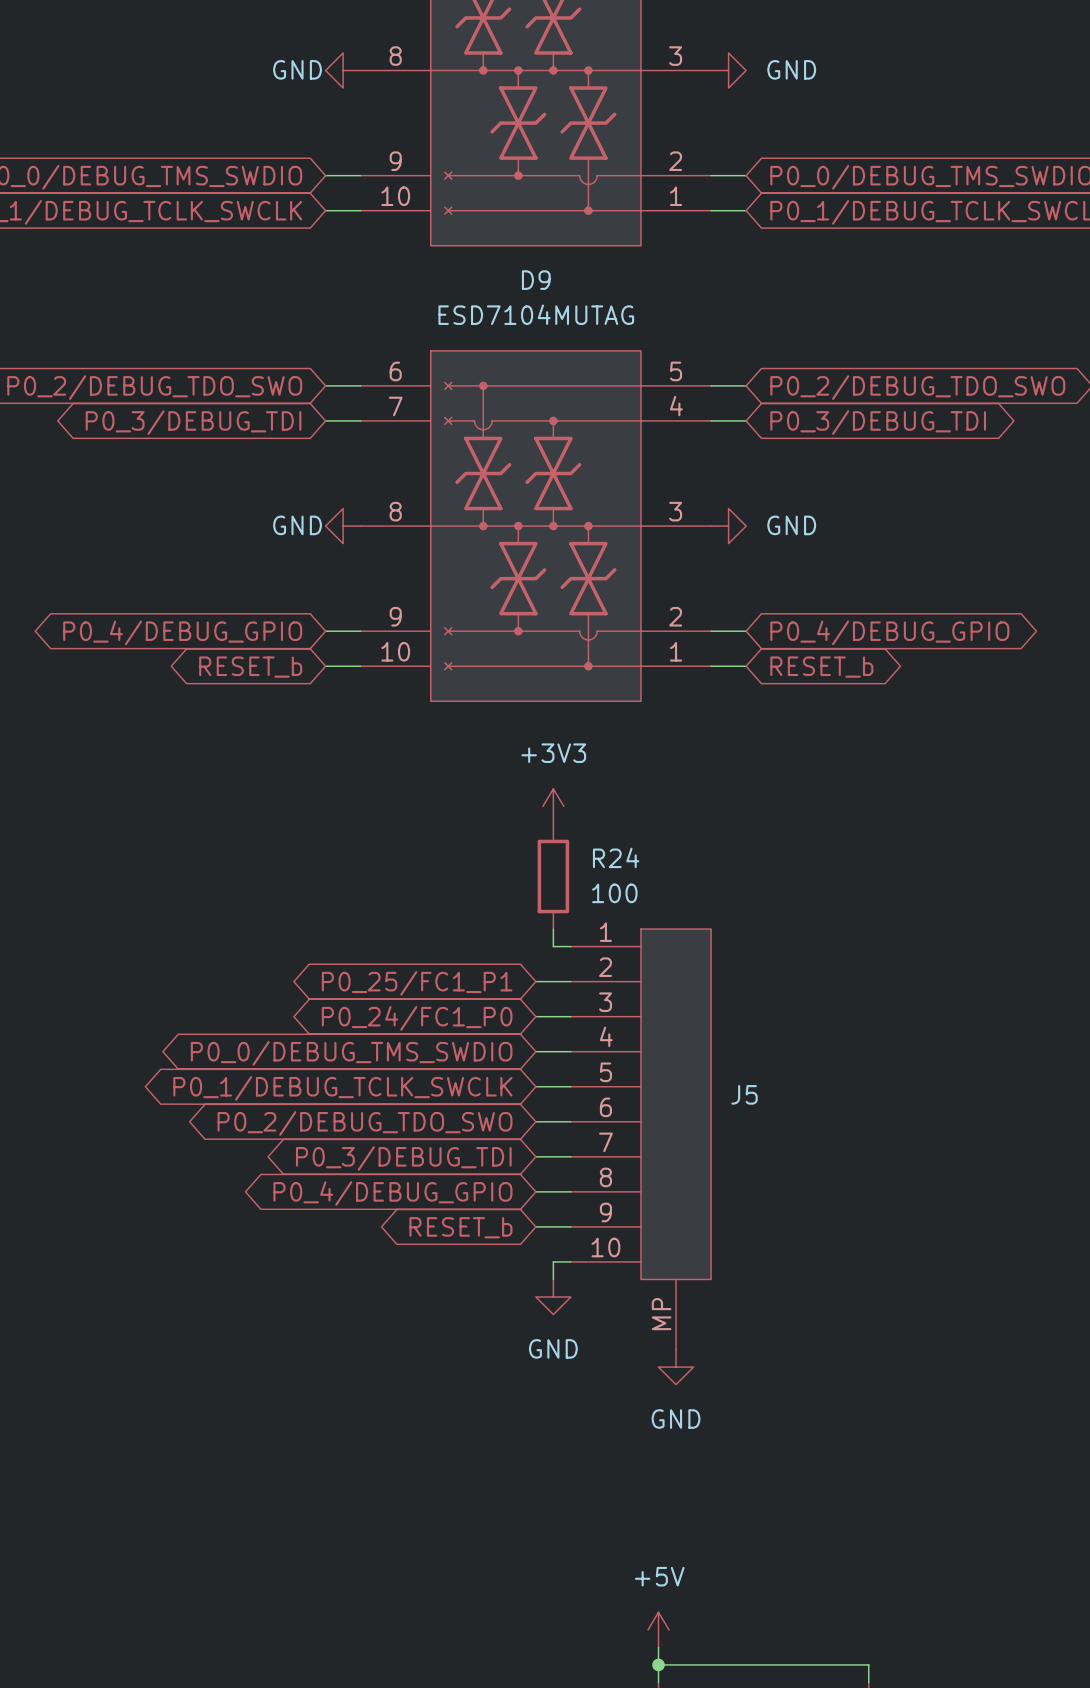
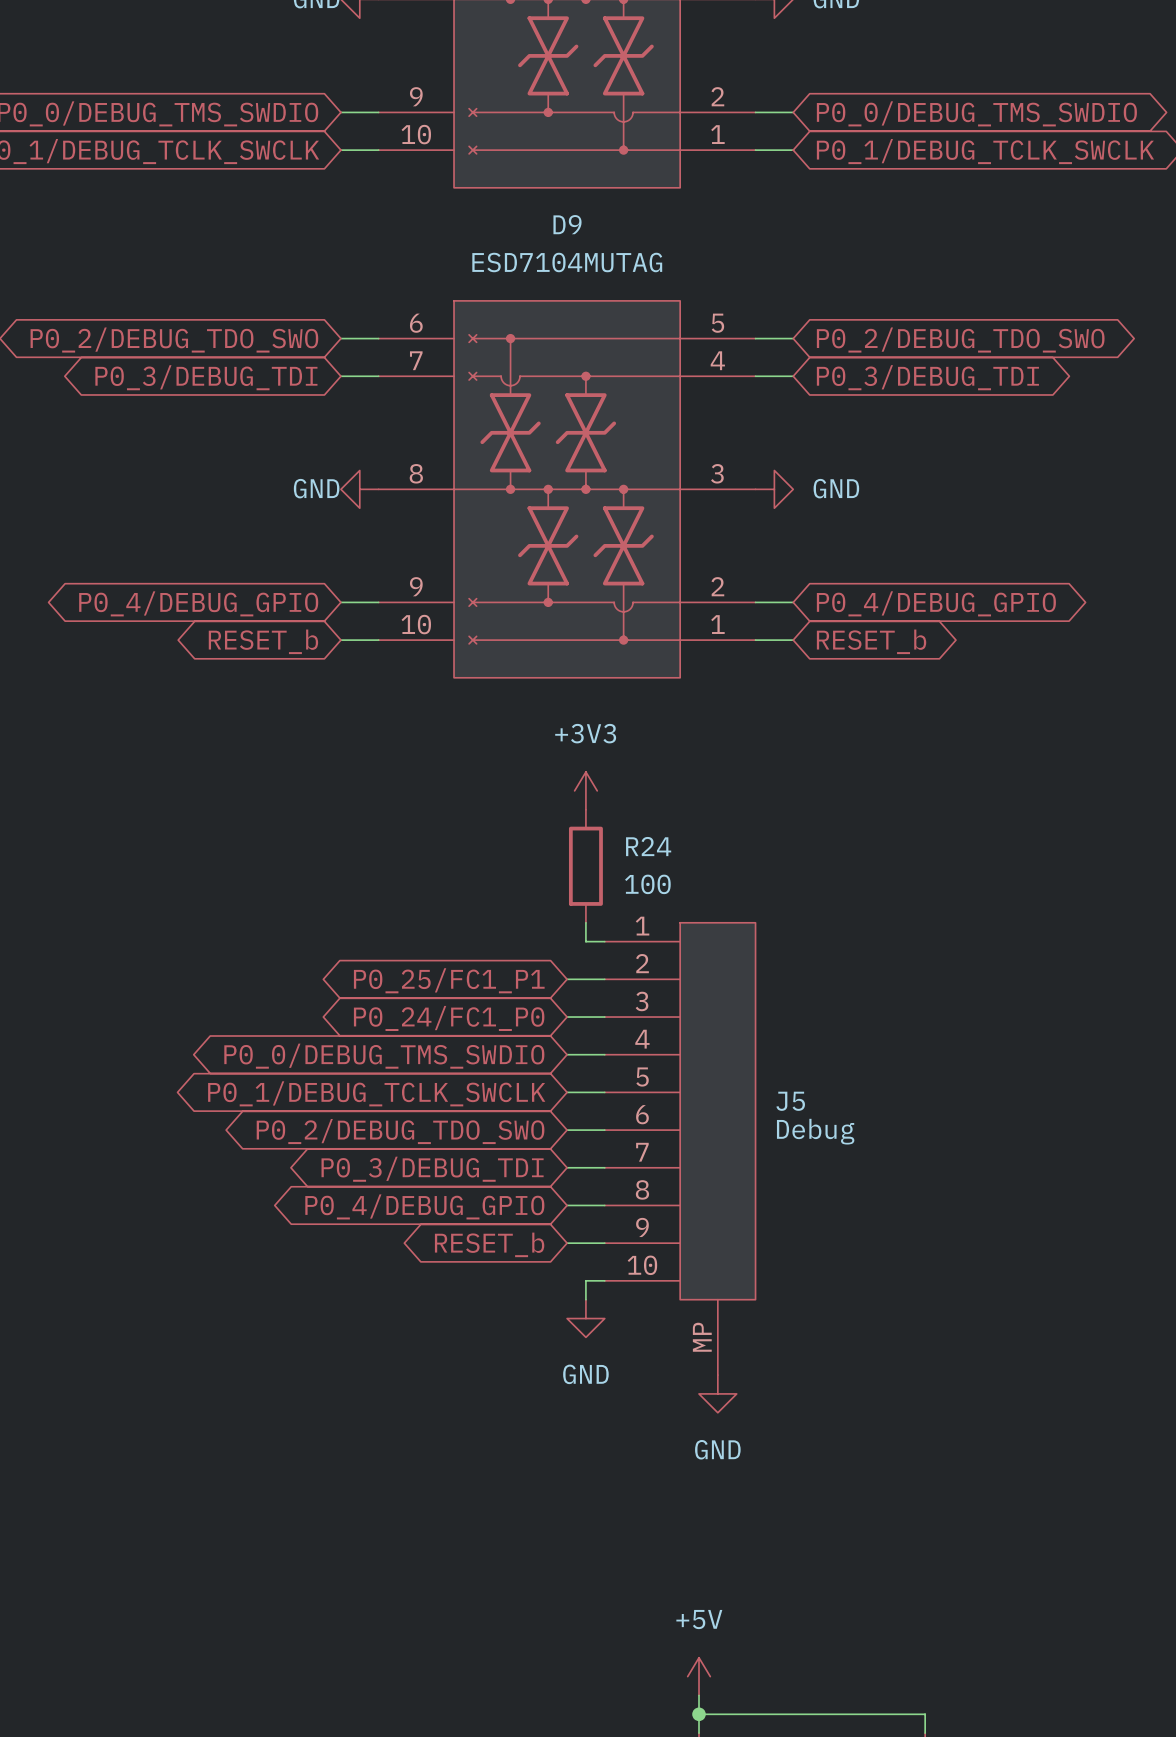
J5 value: none -> Debug (815, 1131)

